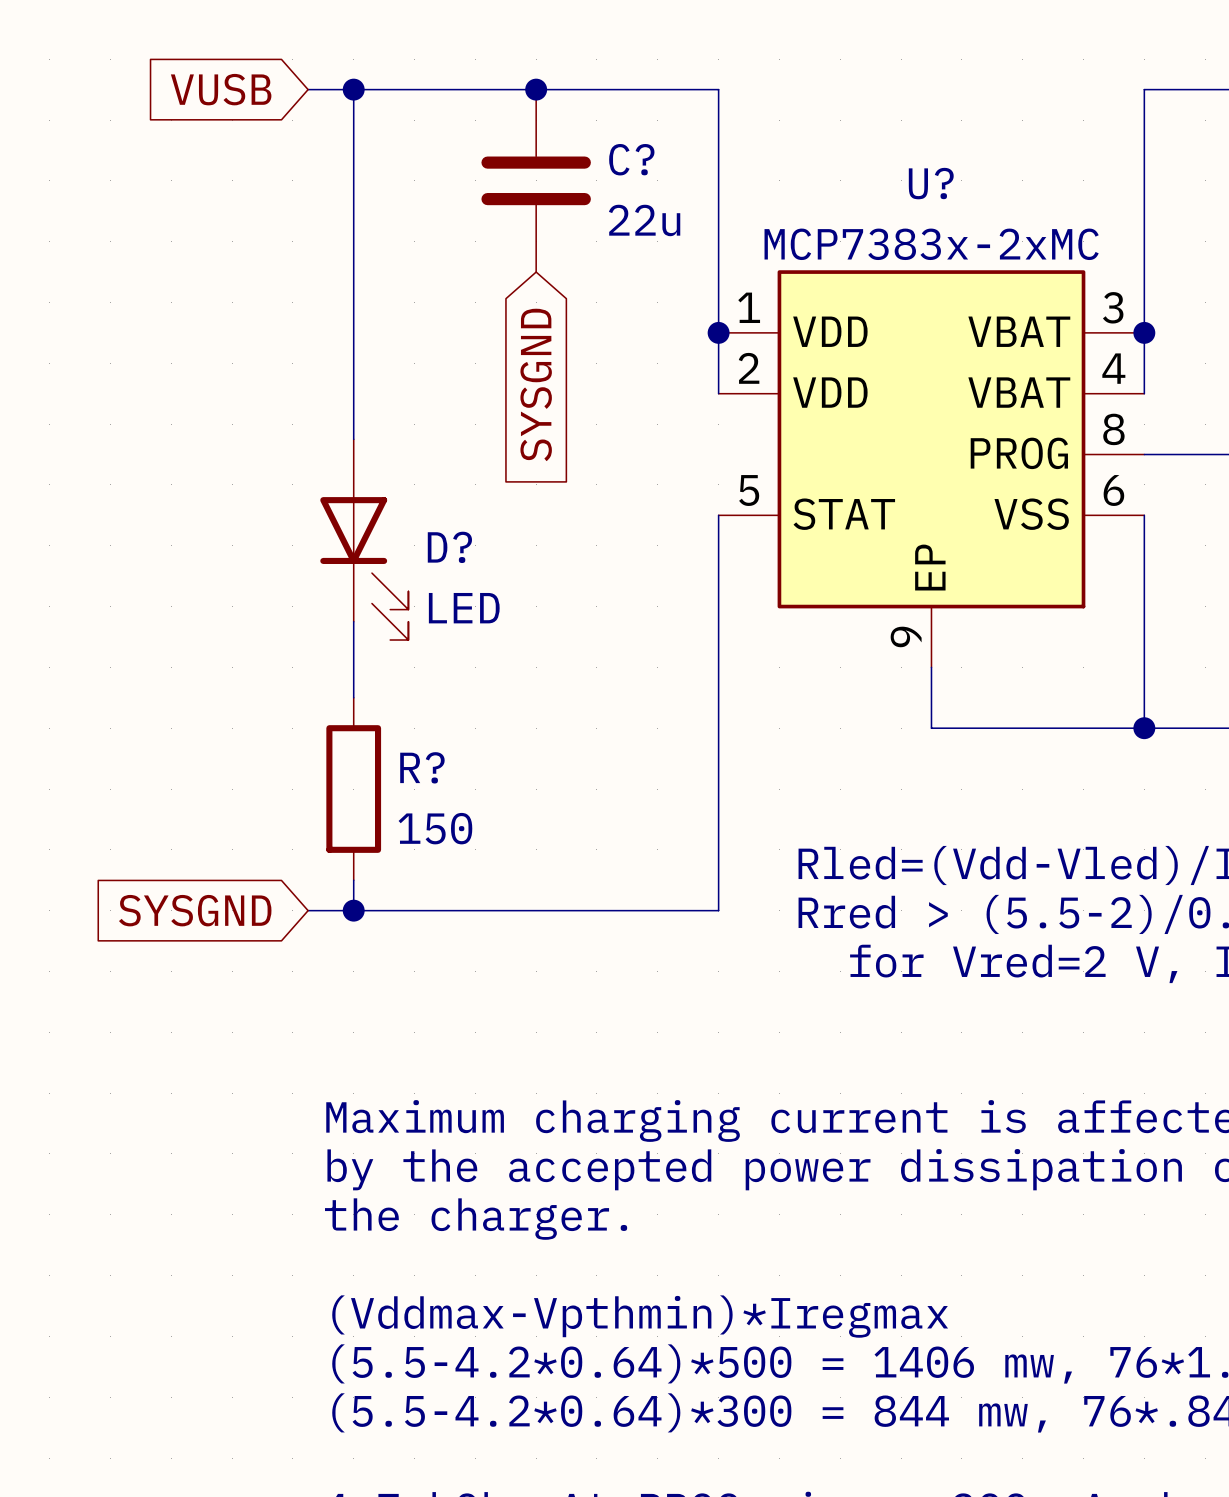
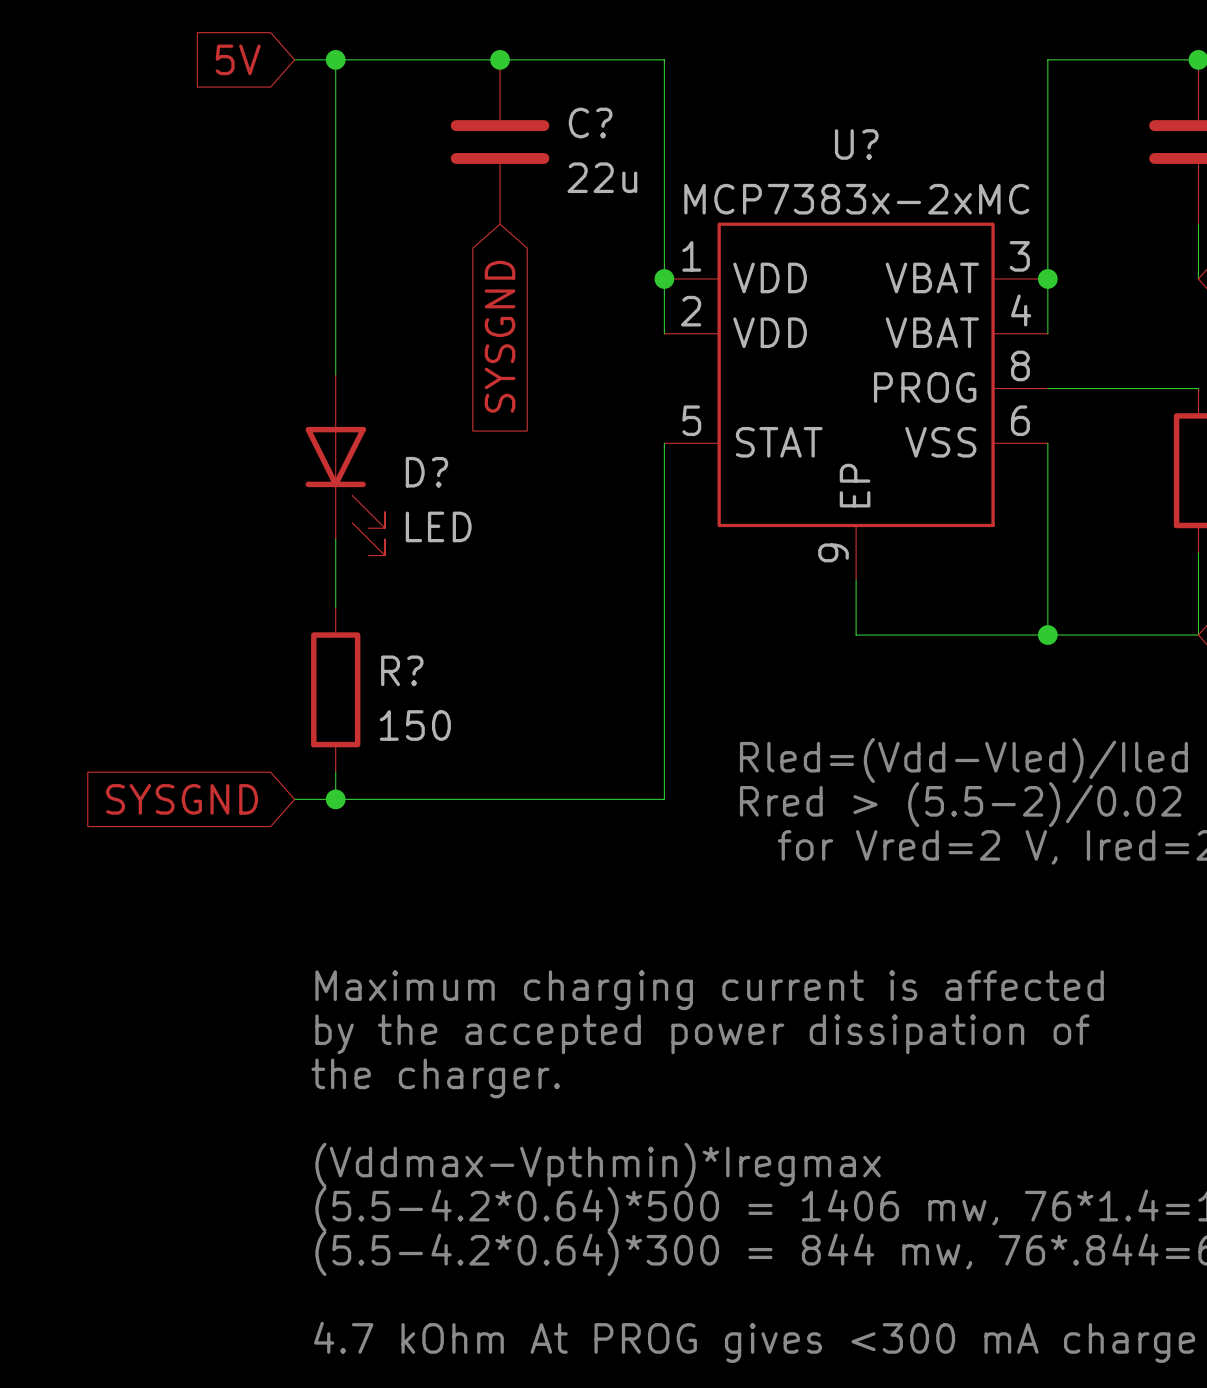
global label: VUSB (221, 89) -> 5V (238, 59)

